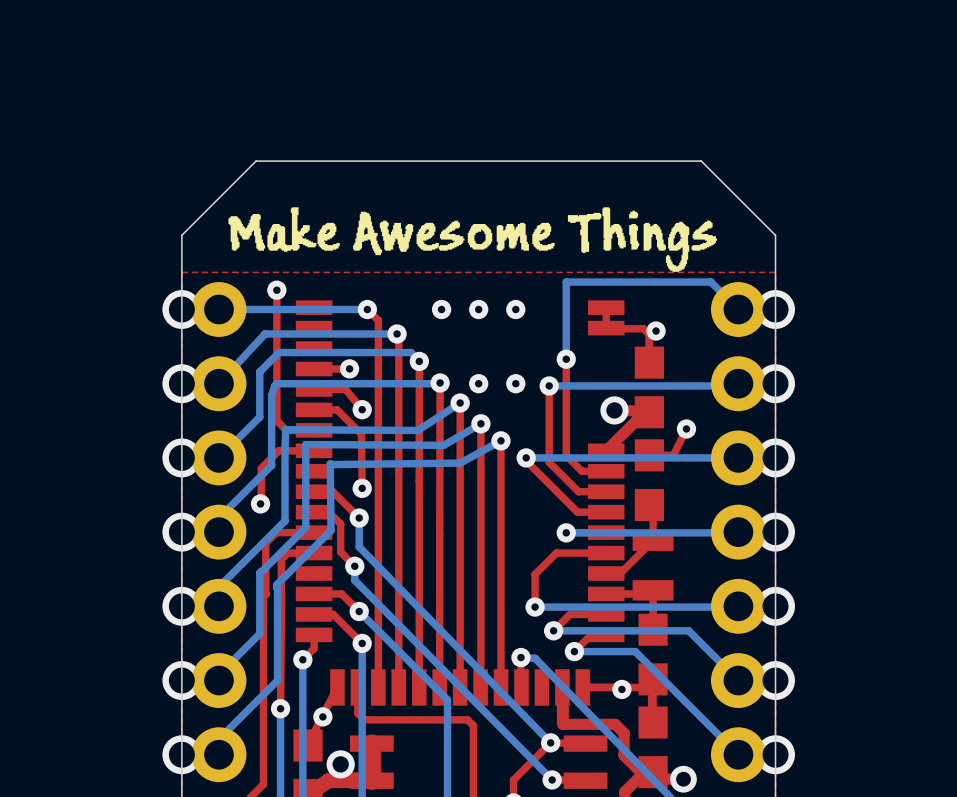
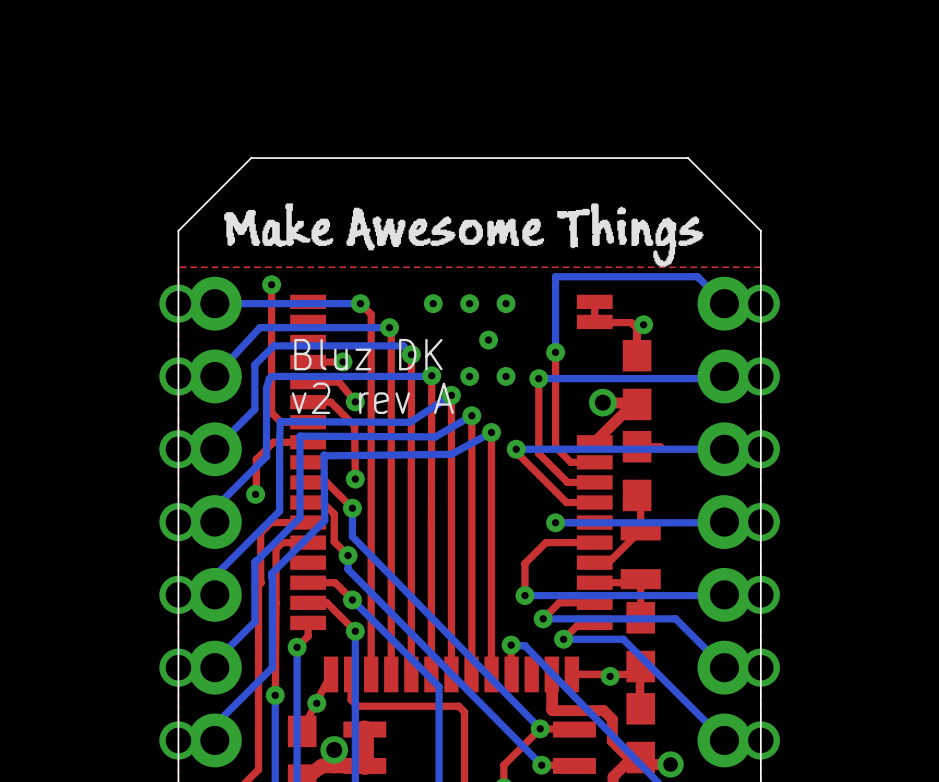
via: none -> (488, 340)
text: none -> Bluz DK (368, 354)
text: none -> v2 rev A (372, 398)
top track: (686, 428) (673, 455) -> none
via: (686, 428) -> none

